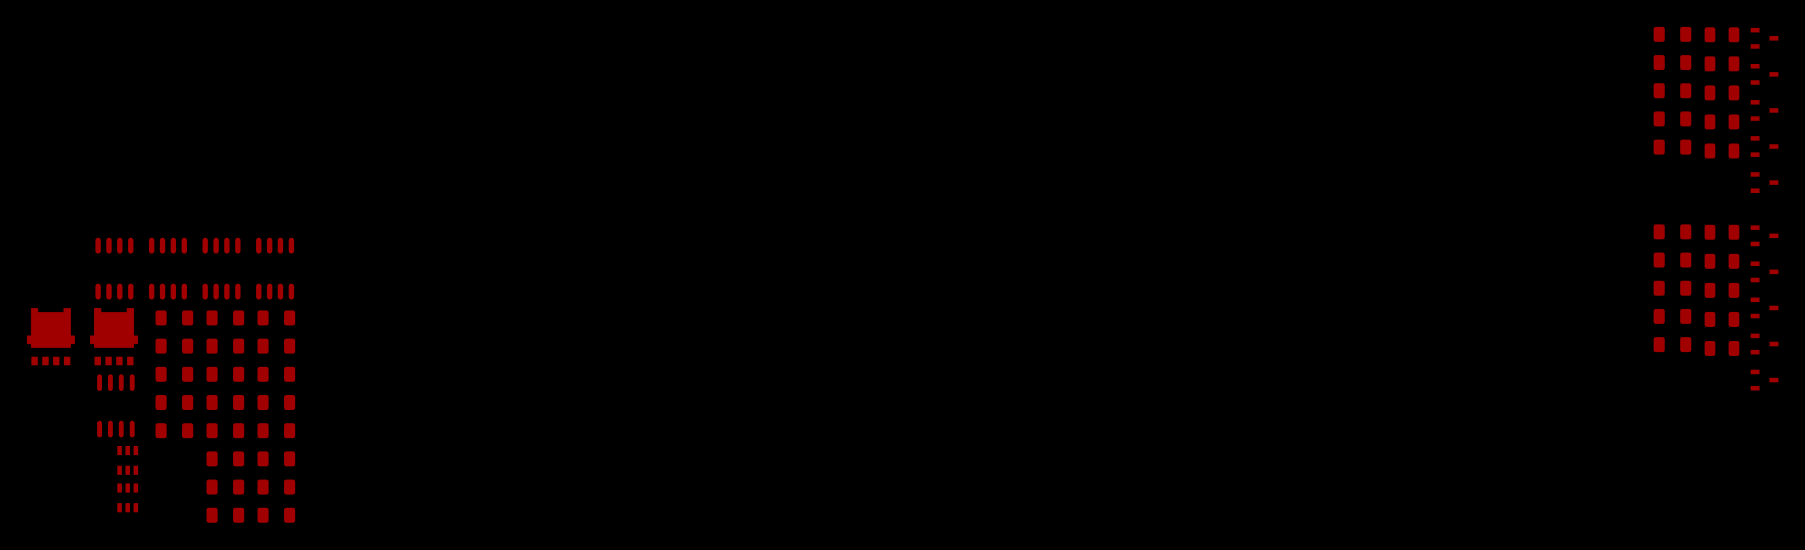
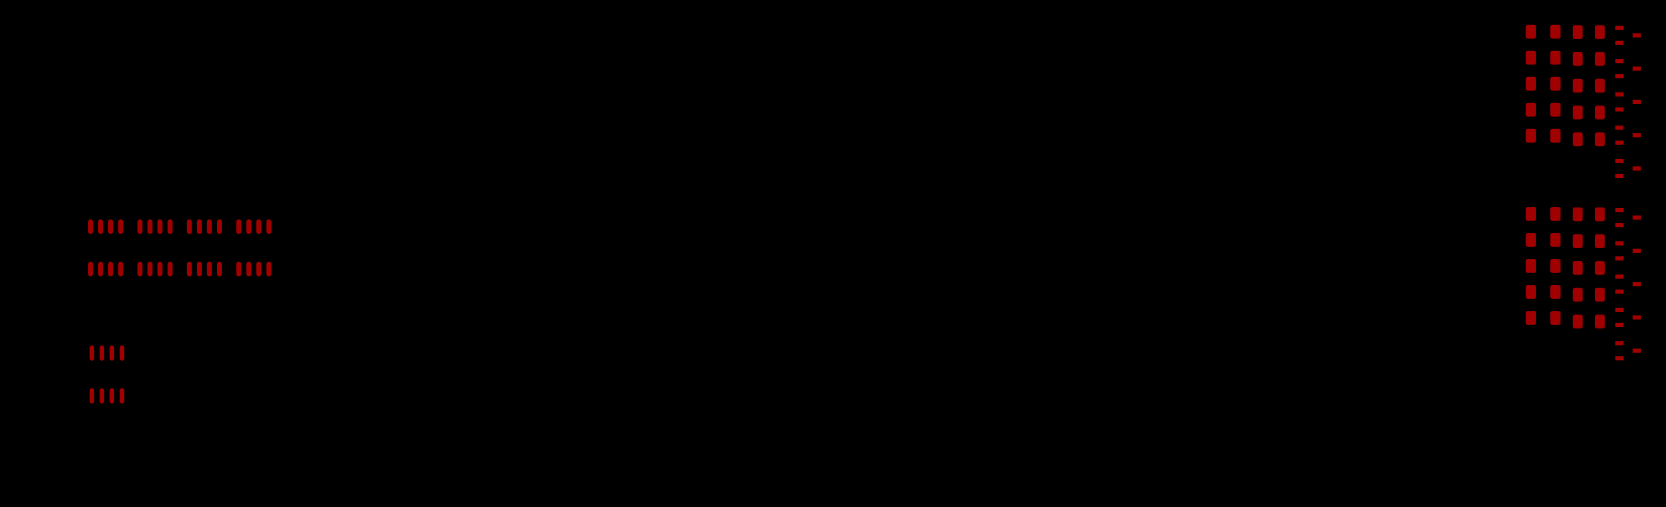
part: (174, 317) -> none
part: (225, 317) -> none
part: (276, 317) -> none
part: (50, 336) -> none
part: (114, 336) -> none
part: (174, 346) -> none
part: (225, 346) -> none
part: (276, 346) -> none
part: (174, 374) -> none
part: (225, 374) -> none
part: (276, 374) -> none
part: (174, 402) -> none
part: (225, 402) -> none
part: (276, 402) -> none
part: (174, 430) -> none
part: (225, 430) -> none
part: (276, 430) -> none
part: (225, 458) -> none
part: (276, 458) -> none
part: (127, 460) -> none
part: (225, 487) -> none
part: (276, 487) -> none
part: (127, 497) -> none
part: (225, 515) -> none
part: (276, 515) -> none

